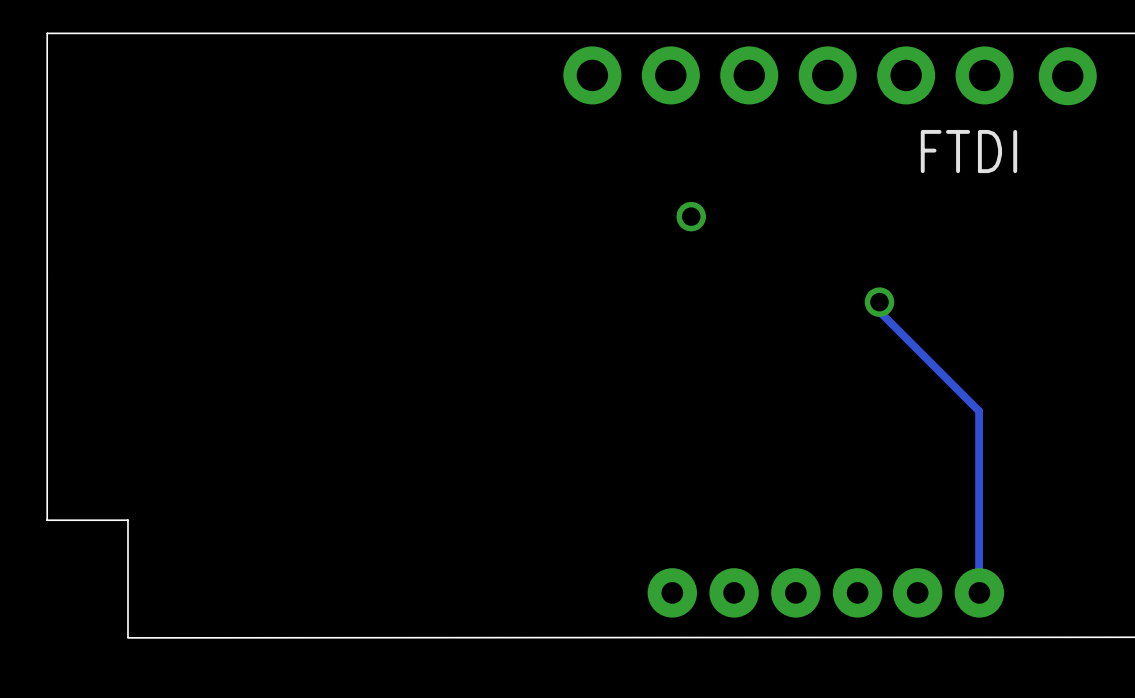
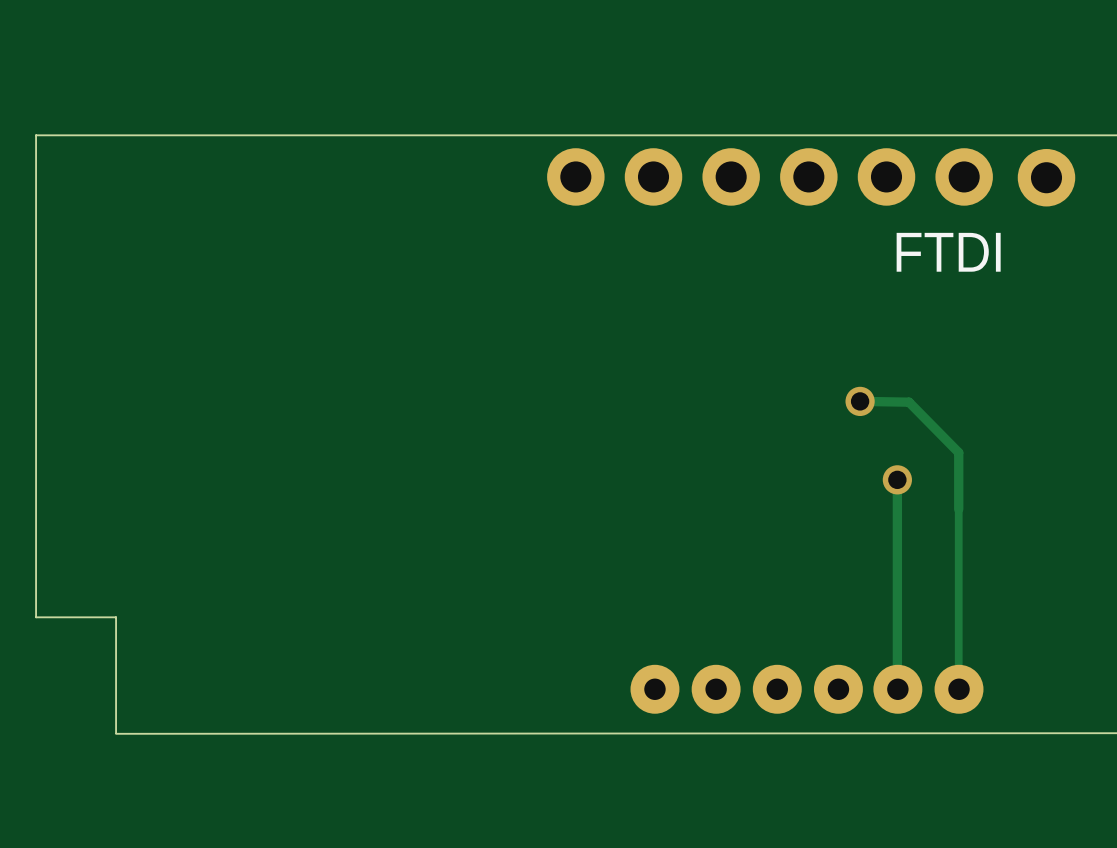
via: (691, 216) -> none
track: (879, 302) (879, 311) (979, 411) -> (862, 401) (909, 402) (958, 452) (958, 509)
track: none -> (897, 479) (897, 689)
via: none -> (897, 479)

